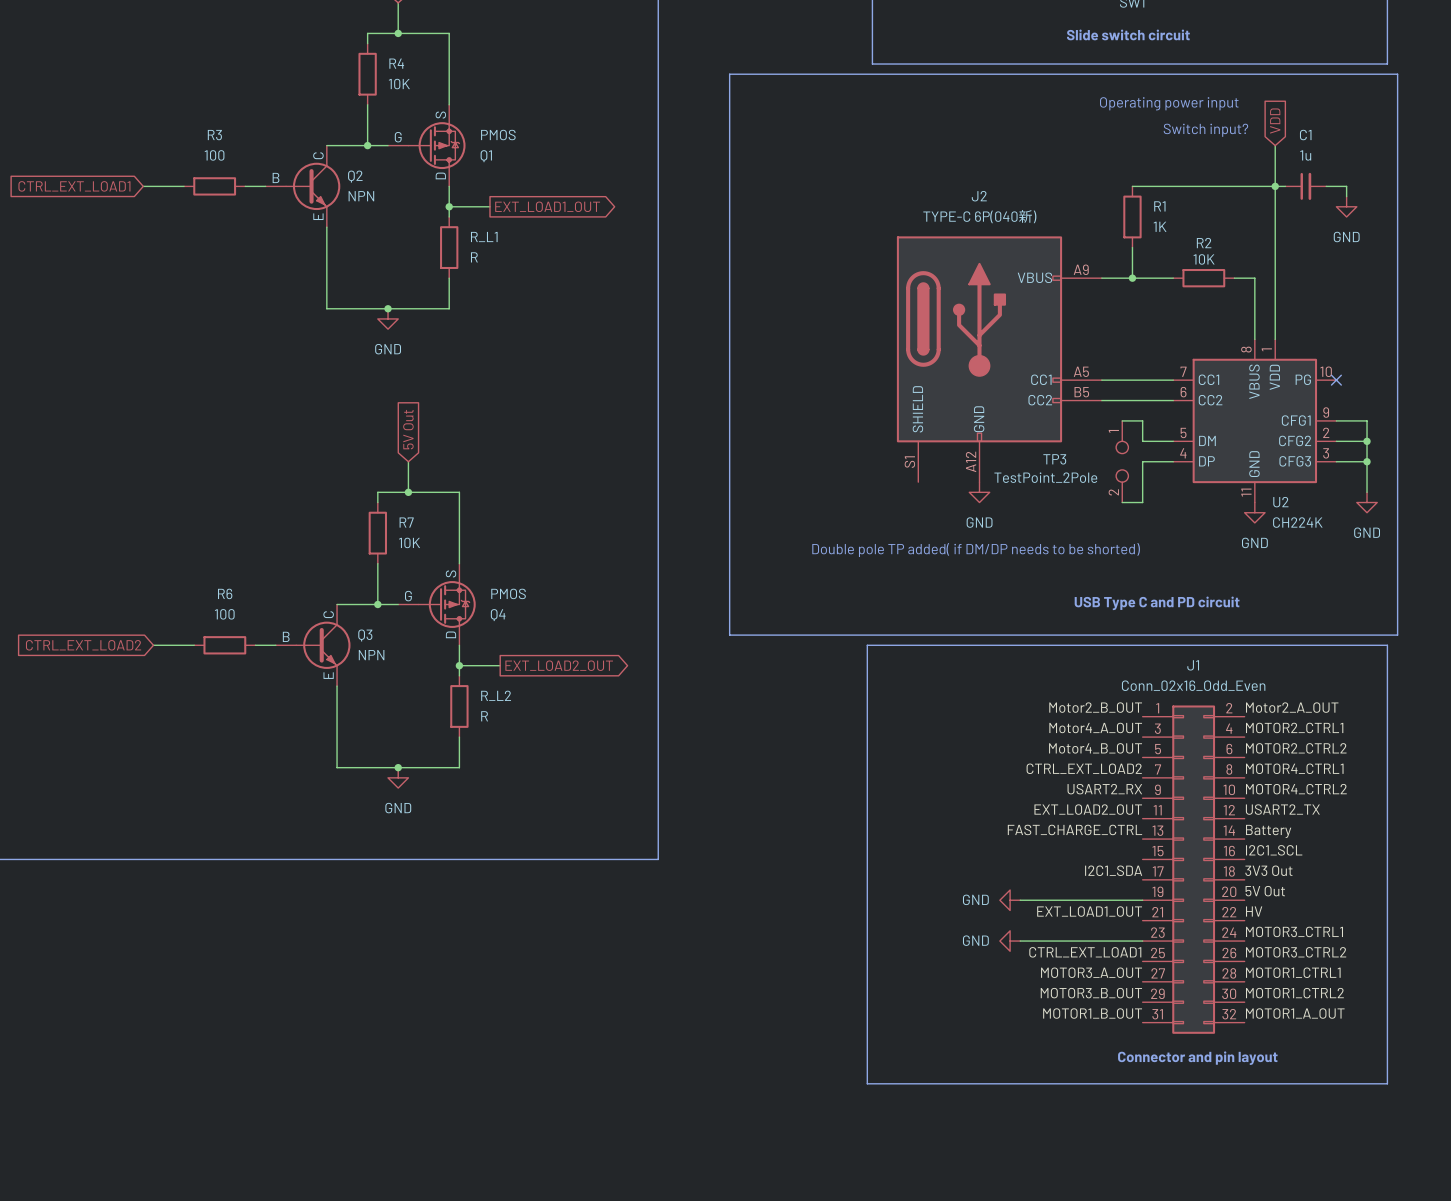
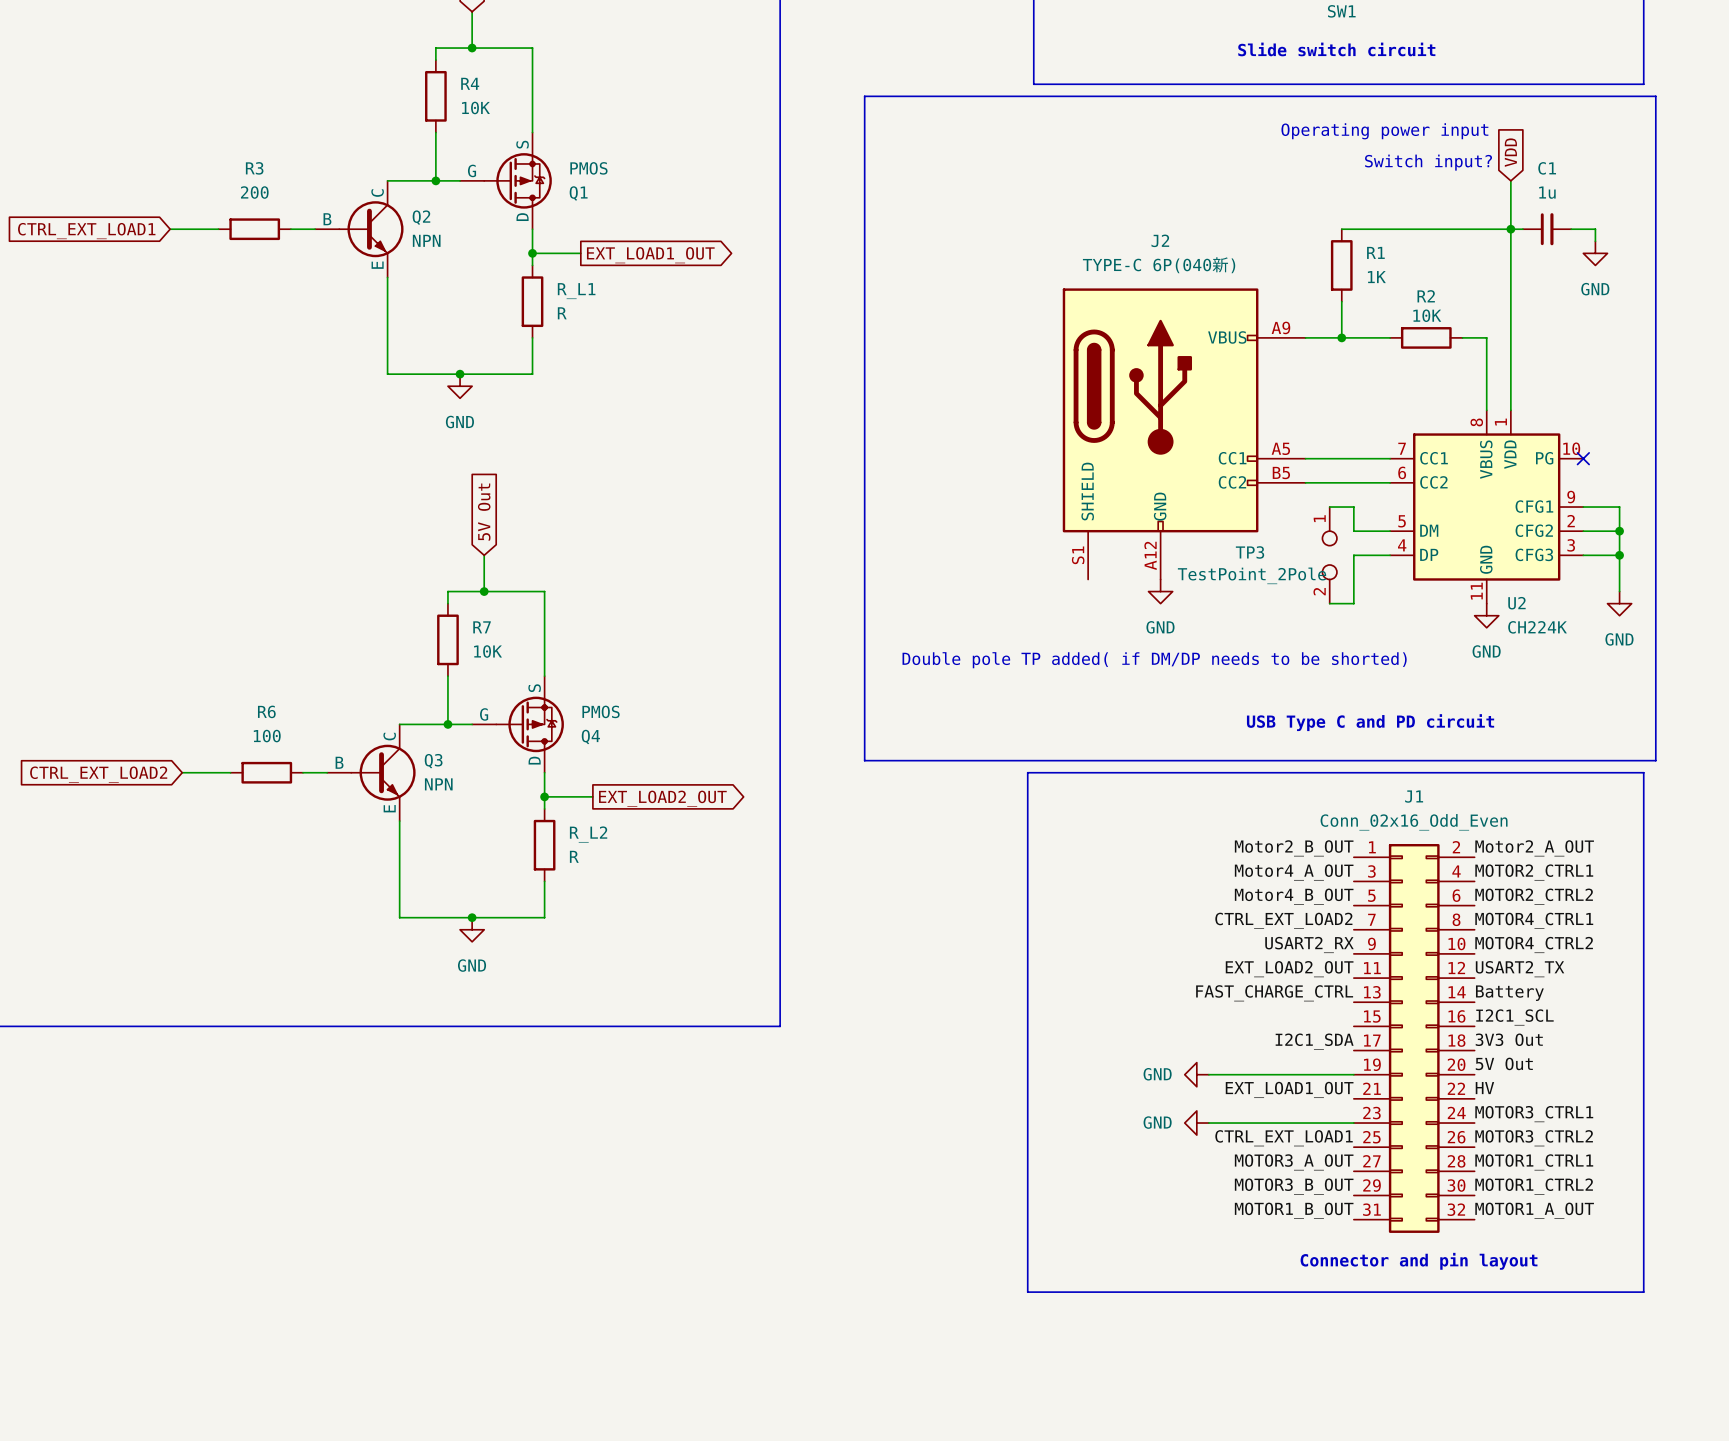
R3 value: 100 (214, 155) -> 200 (254, 192)

